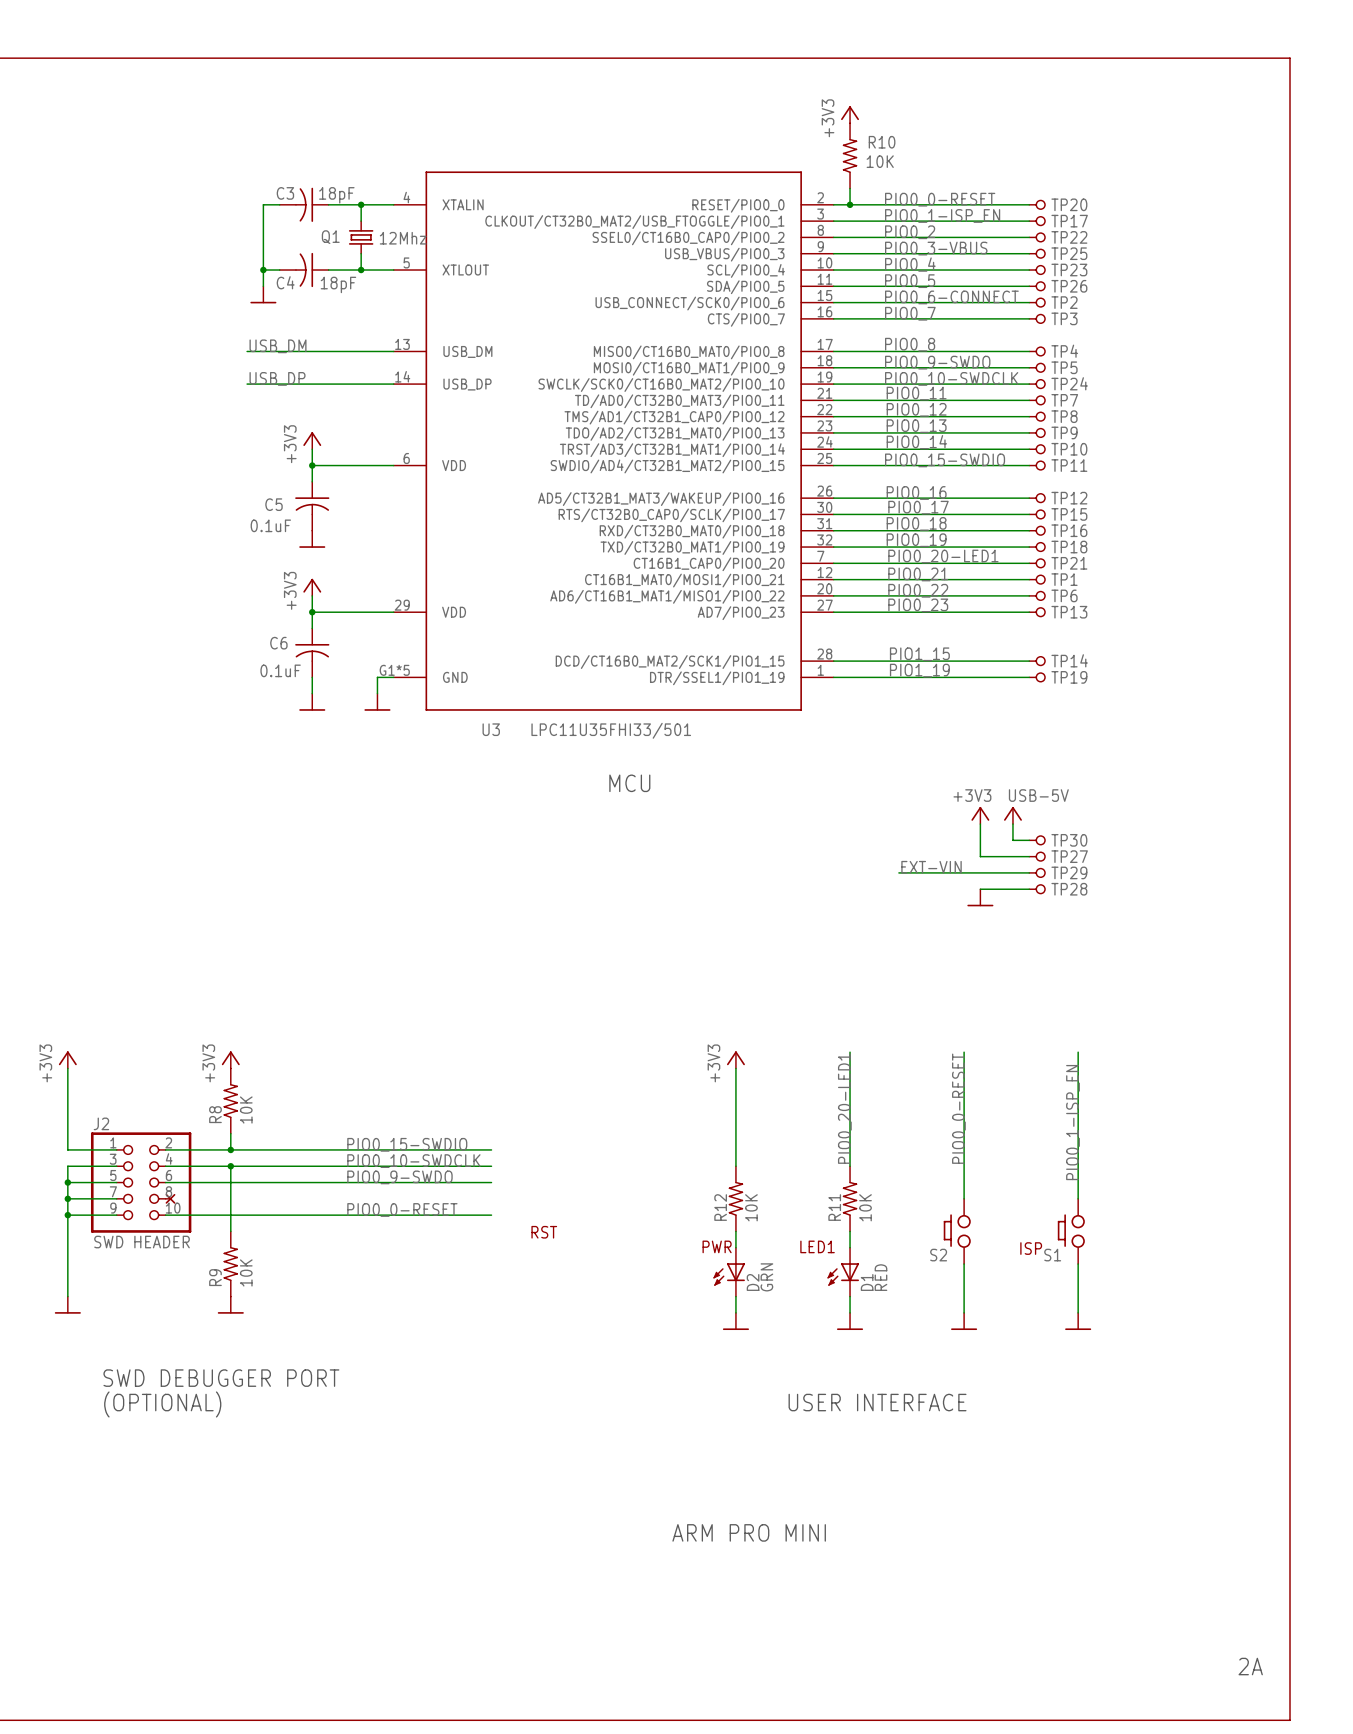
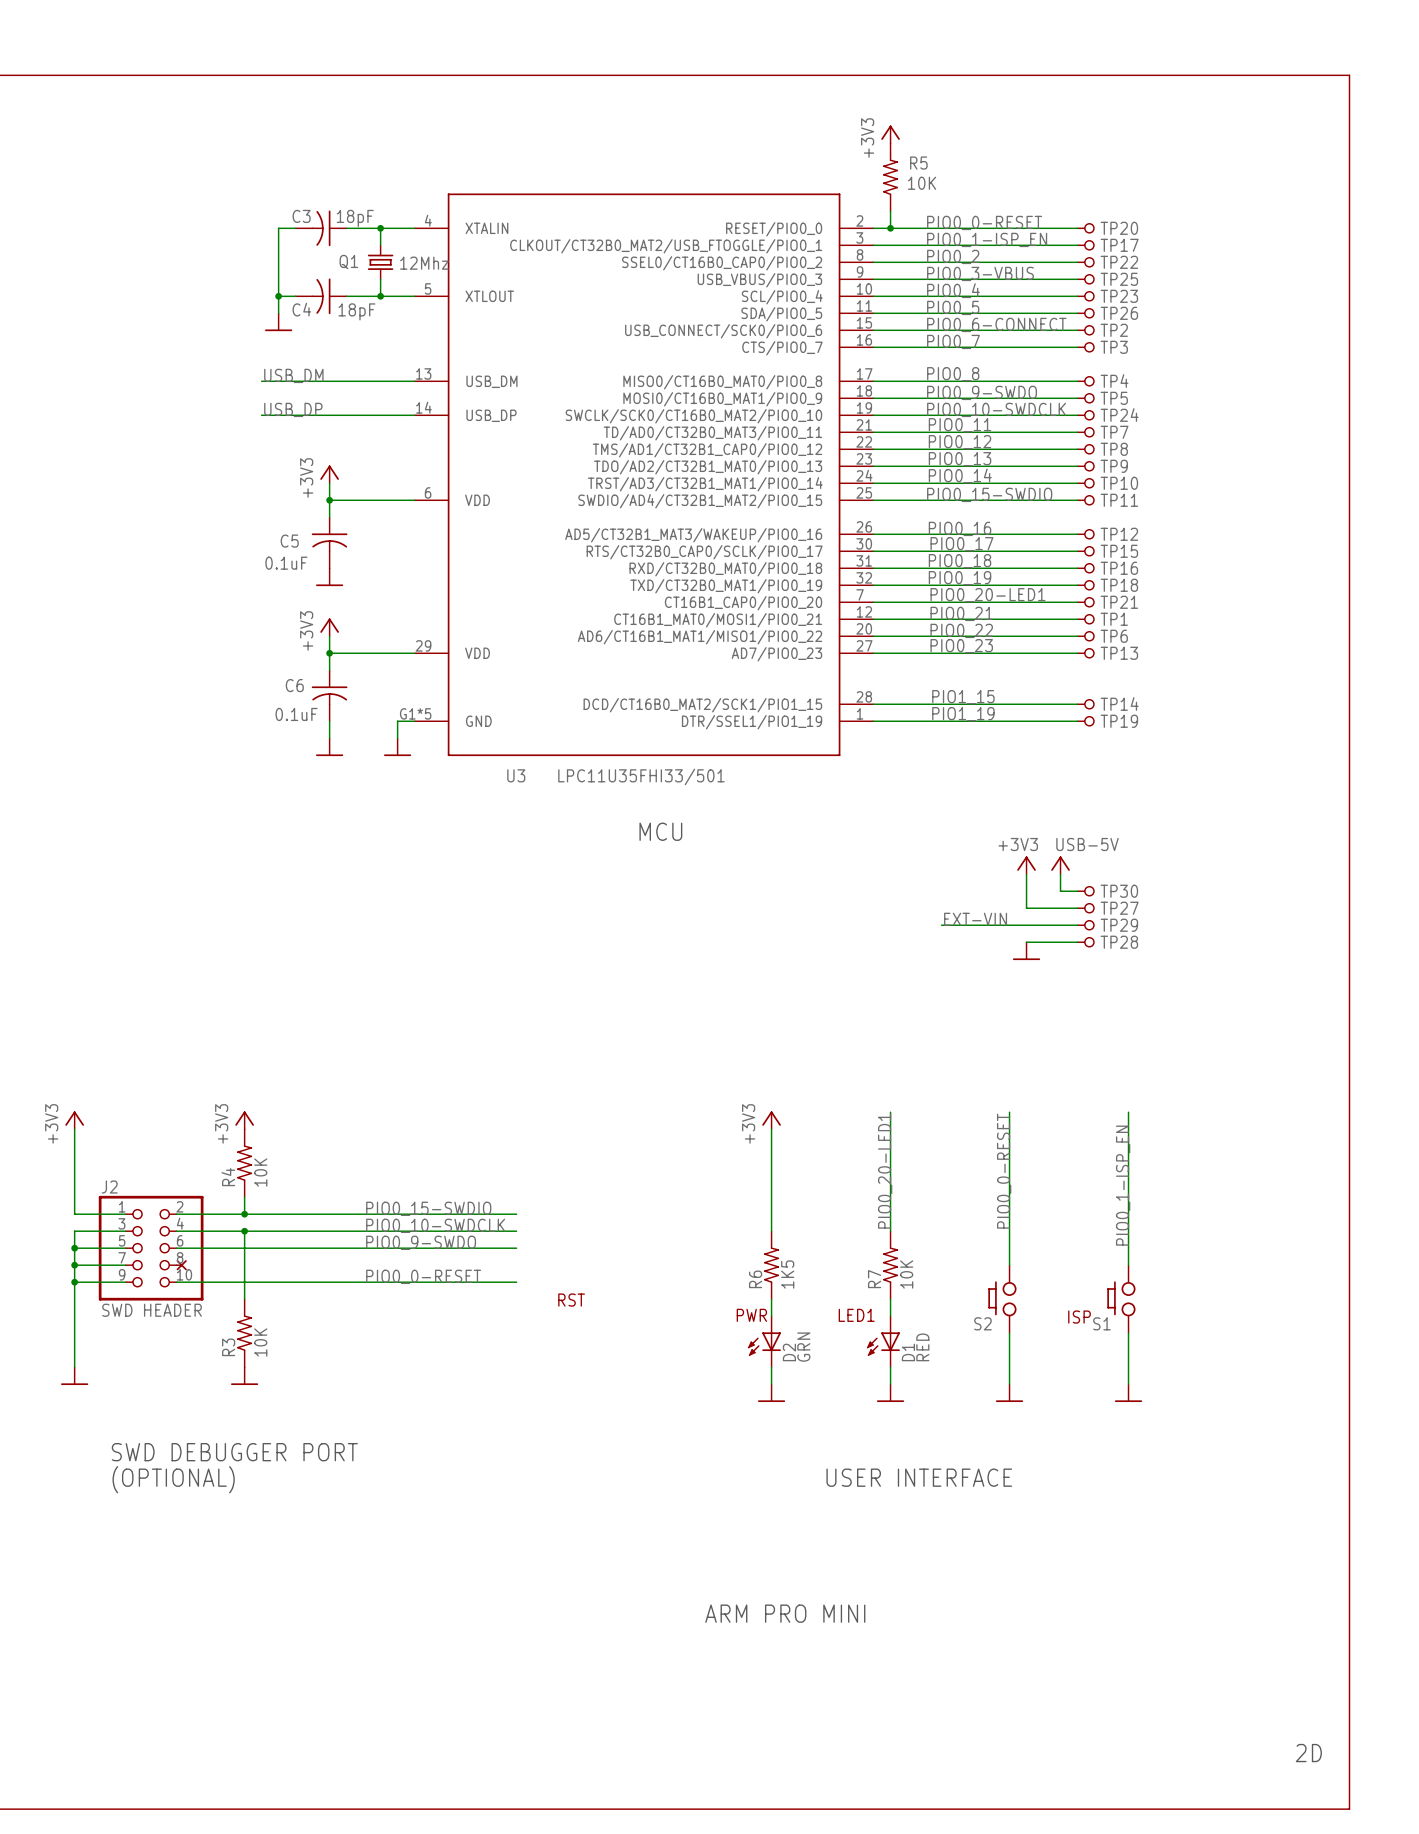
R10 name: R10 (882, 142) -> R5 (918, 163)
R8 name: R8 (215, 1114) -> R4 (228, 1177)
R12 name: R12 (720, 1207) -> R6 (755, 1279)
R12 value: 10K (751, 1207) -> 1K5 (787, 1274)
R11 name: R11 (834, 1207) -> R7 (874, 1279)
R9 name: R9 (215, 1277) -> R3 (228, 1347)
text: 2A (1250, 1666) -> 2D (1308, 1753)

